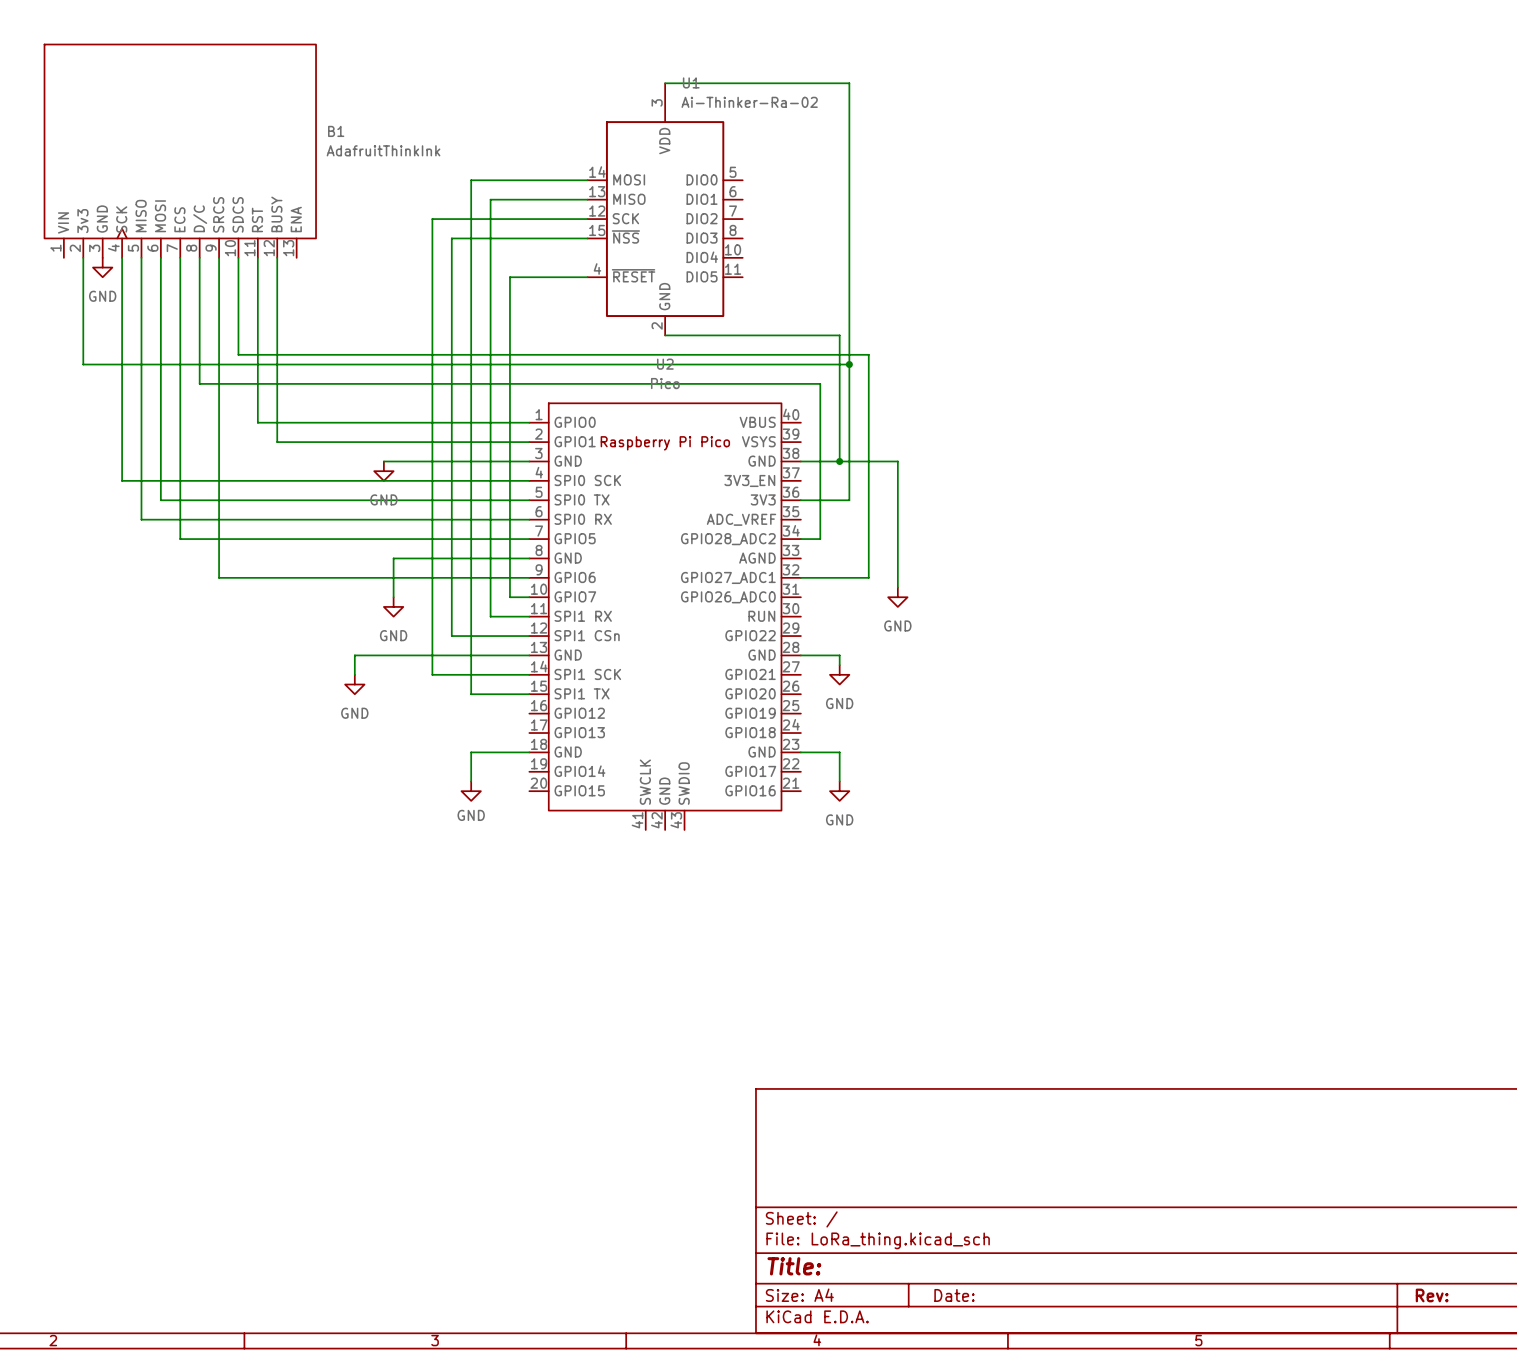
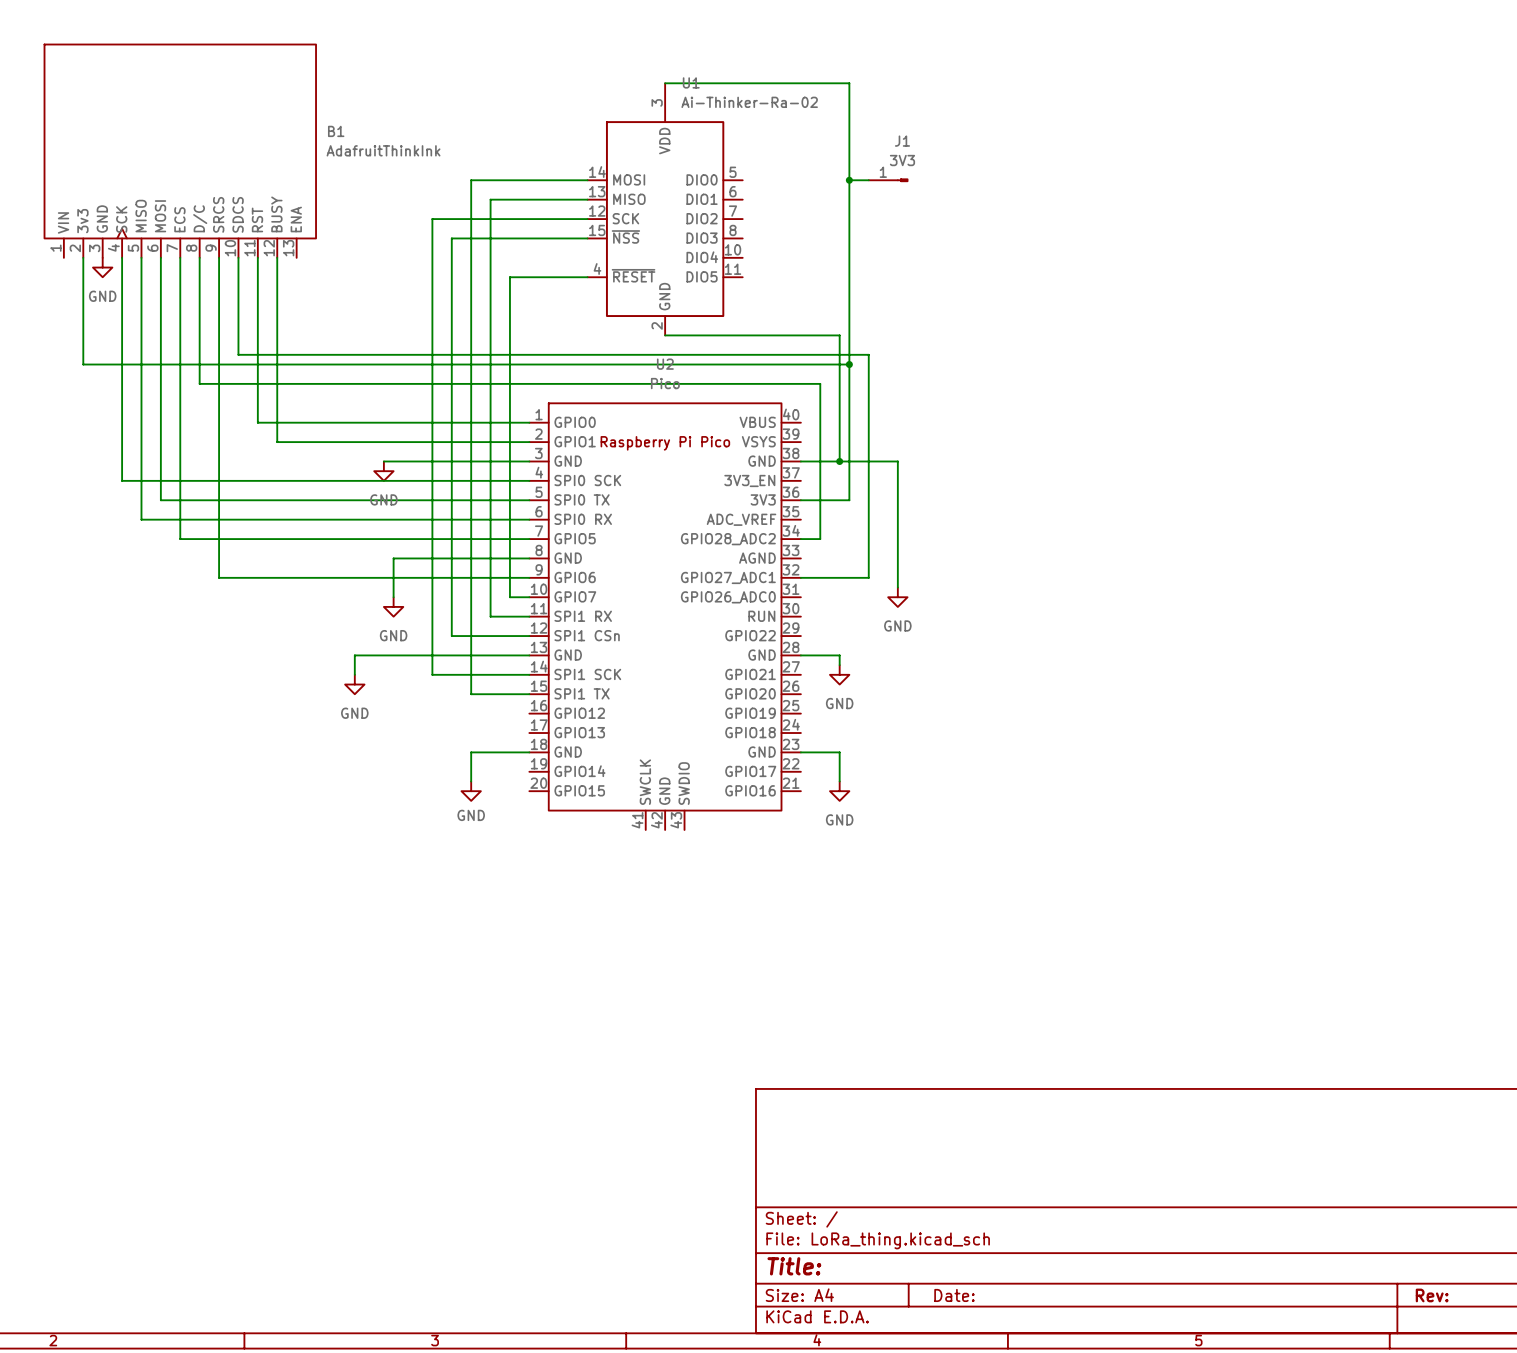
wire: none -> (849, 180) (868, 180)
junction: none -> (849, 180)
J1: none -> 3V3 (888, 180)

